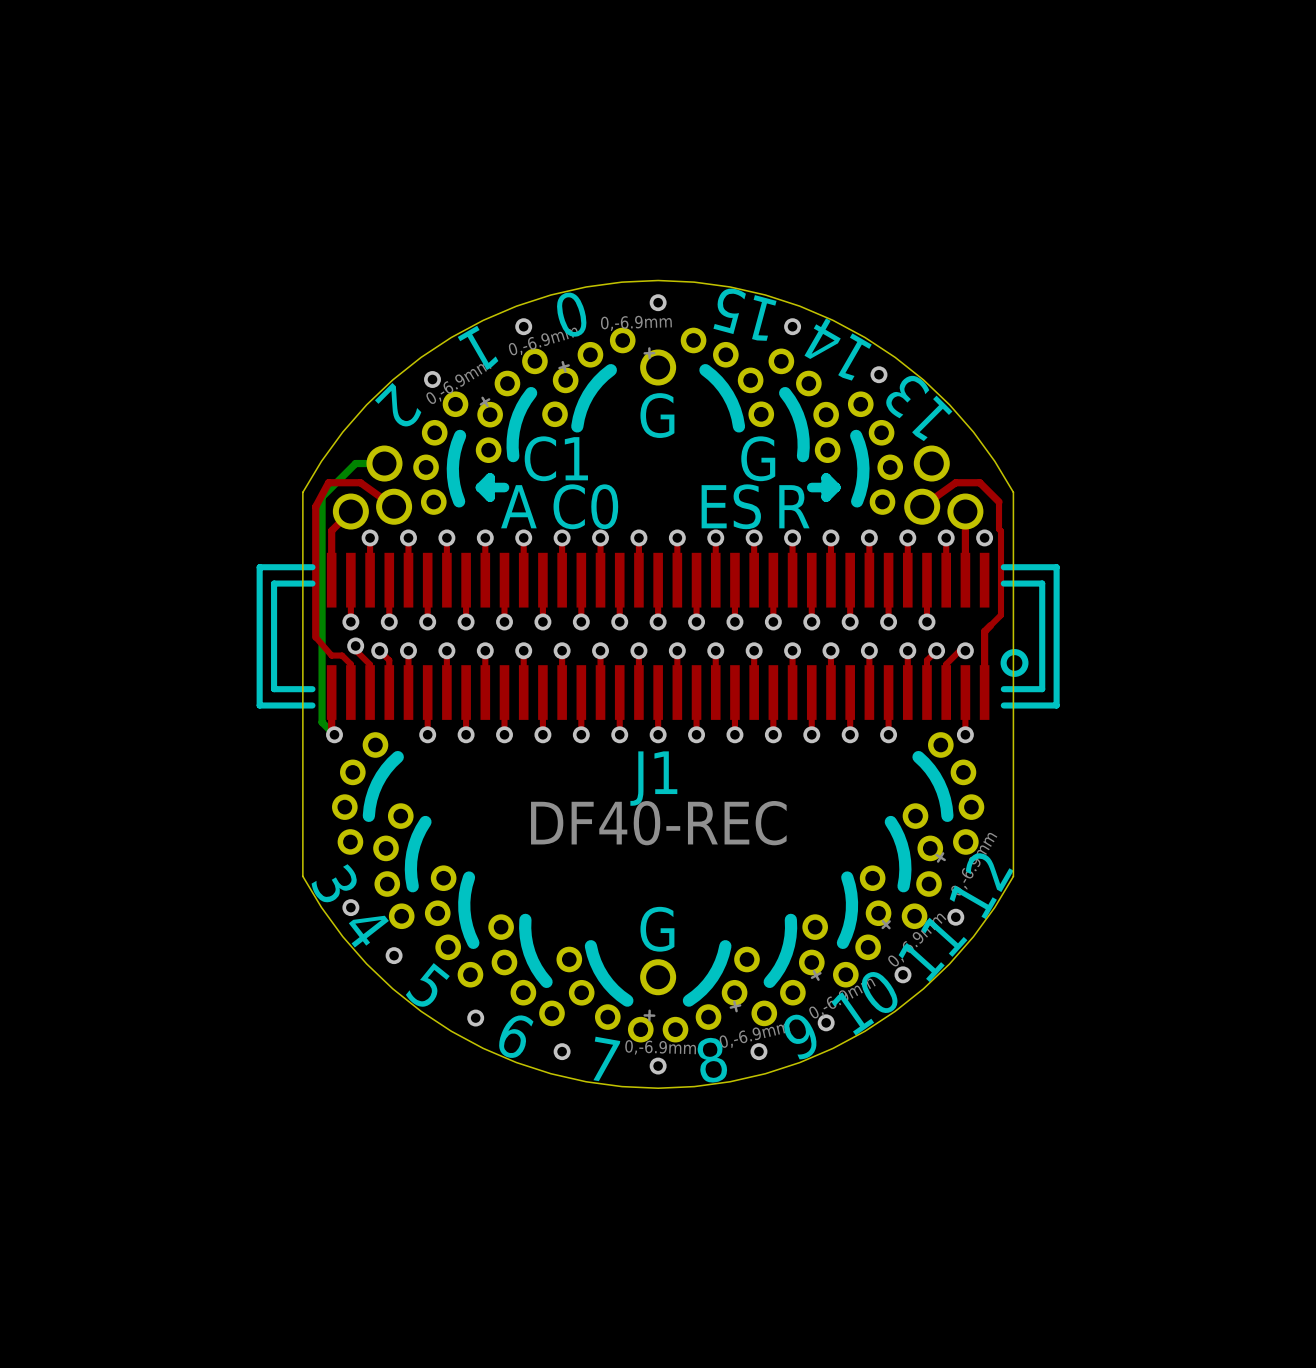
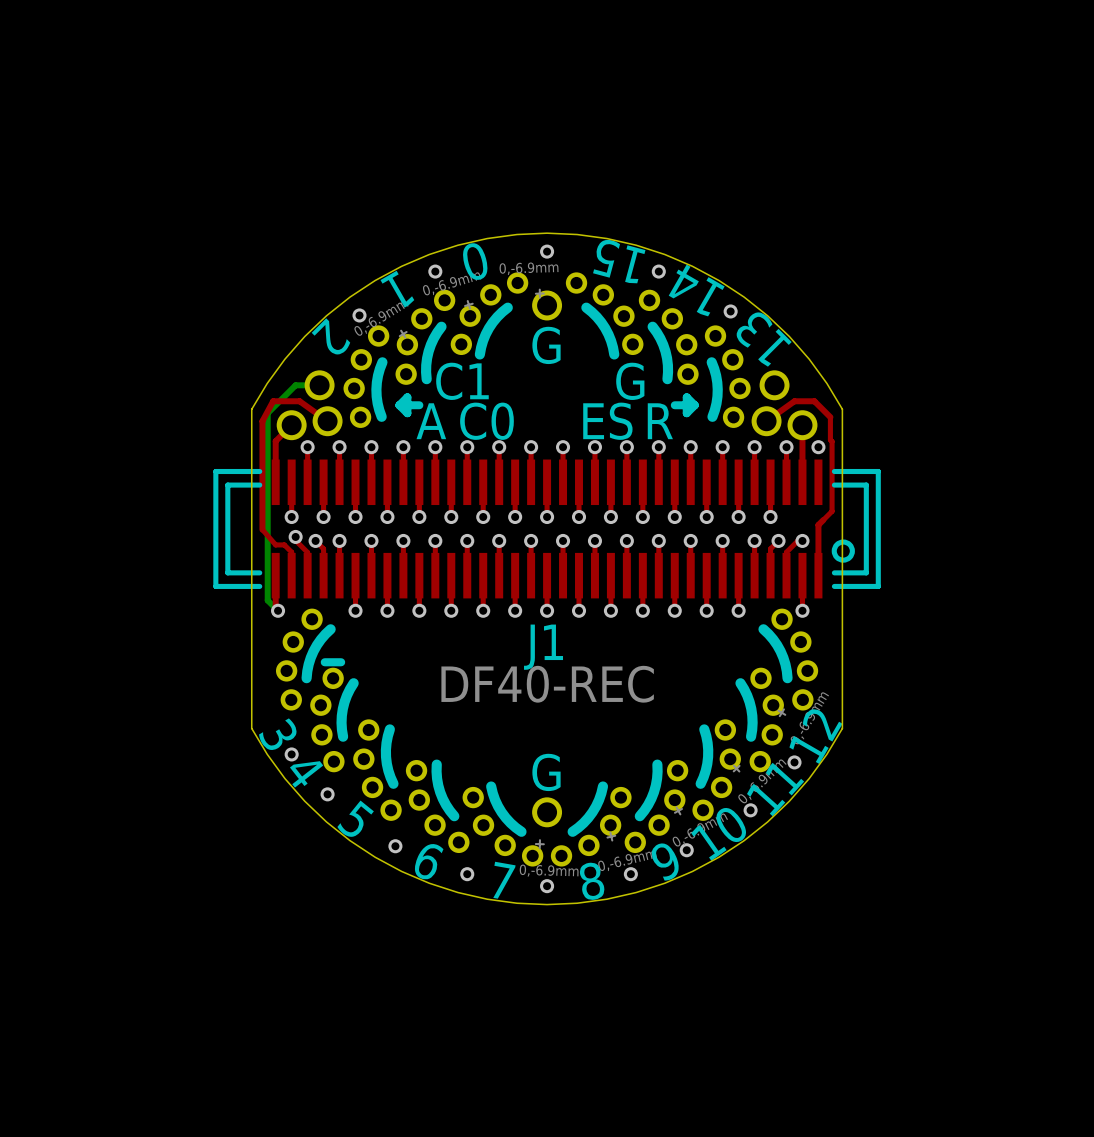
line: none -> (324, 662) (341, 662)

